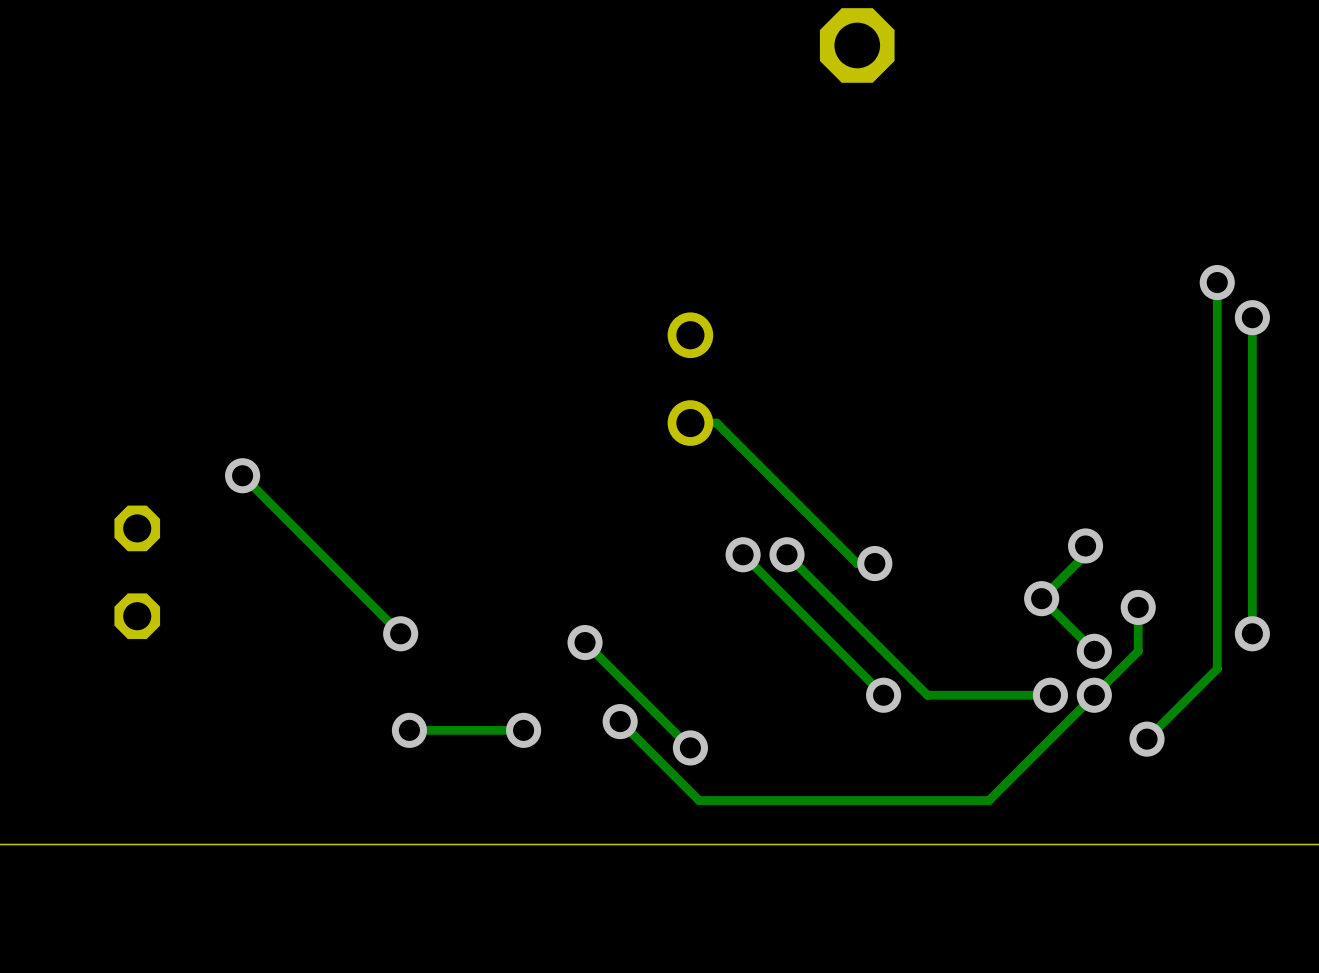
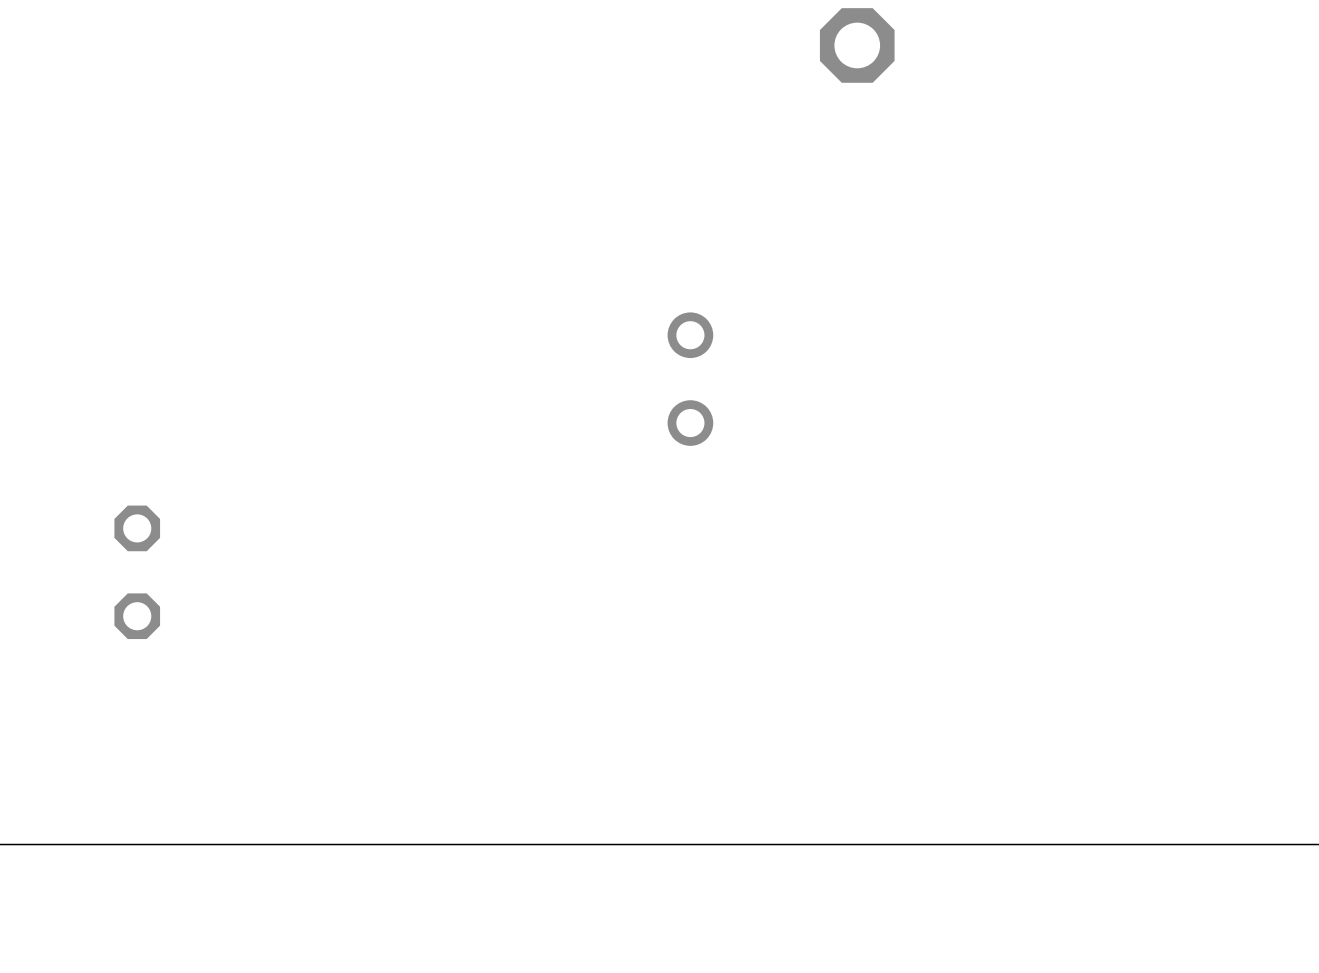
track: (1217, 282) (1217, 668) (1147, 739) -> none
via: (1217, 282) -> none
track: (1252, 317) (1252, 633) -> none
via: (1252, 317) -> none
track: (690, 423) (716, 423) (857, 563) (874, 563) -> none
track: (242, 475) (400, 633) -> none
via: (242, 475) -> none
track: (1085, 545) (1085, 554) (1041, 598) (1094, 651) -> none
via: (1085, 545) -> none
track: (743, 554) (883, 695) -> none
via: (743, 554) -> none
track: (787, 554) (927, 695) (1050, 695) -> none
via: (787, 554) -> none
via: (874, 563) -> none
via: (1041, 598) -> none
track: (1138, 607) (1138, 651) (988, 800) (699, 800) (620, 721) -> none
via: (1138, 607) -> none
via: (400, 633) -> none
via: (1252, 633) -> none
track: (585, 642) (690, 747) -> none
via: (585, 642) -> none
via: (1094, 651) -> none
via: (883, 695) -> none
via: (1050, 695) -> none
via: (1094, 695) -> none
via: (620, 721) -> none
via: (409, 730) -> none
track: (523, 730) (409, 730) -> none
via: (523, 730) -> none
via: (1147, 739) -> none
via: (690, 747) -> none

